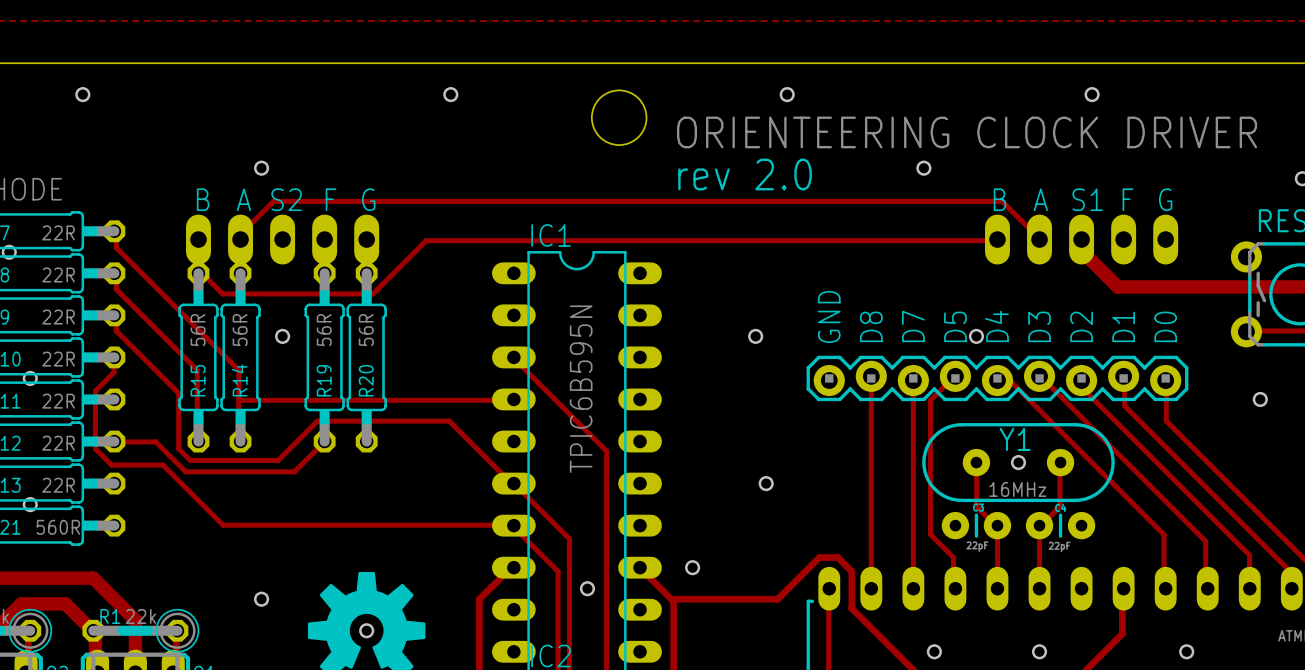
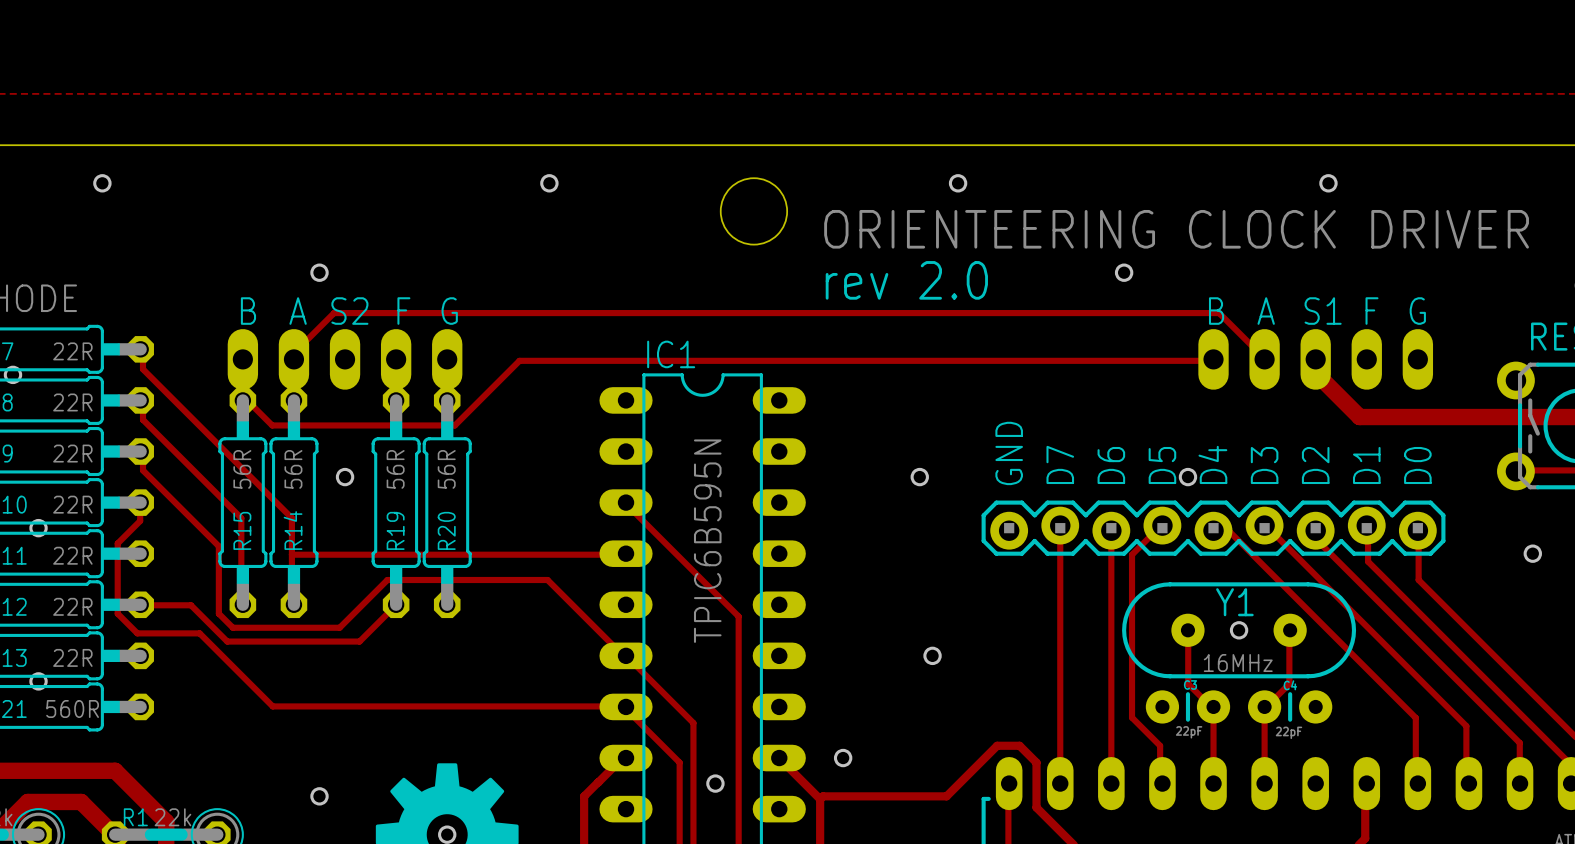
text: D8 (871, 326) -> D7 (1060, 464)
text: D7 (913, 326) -> D6 (1111, 465)

